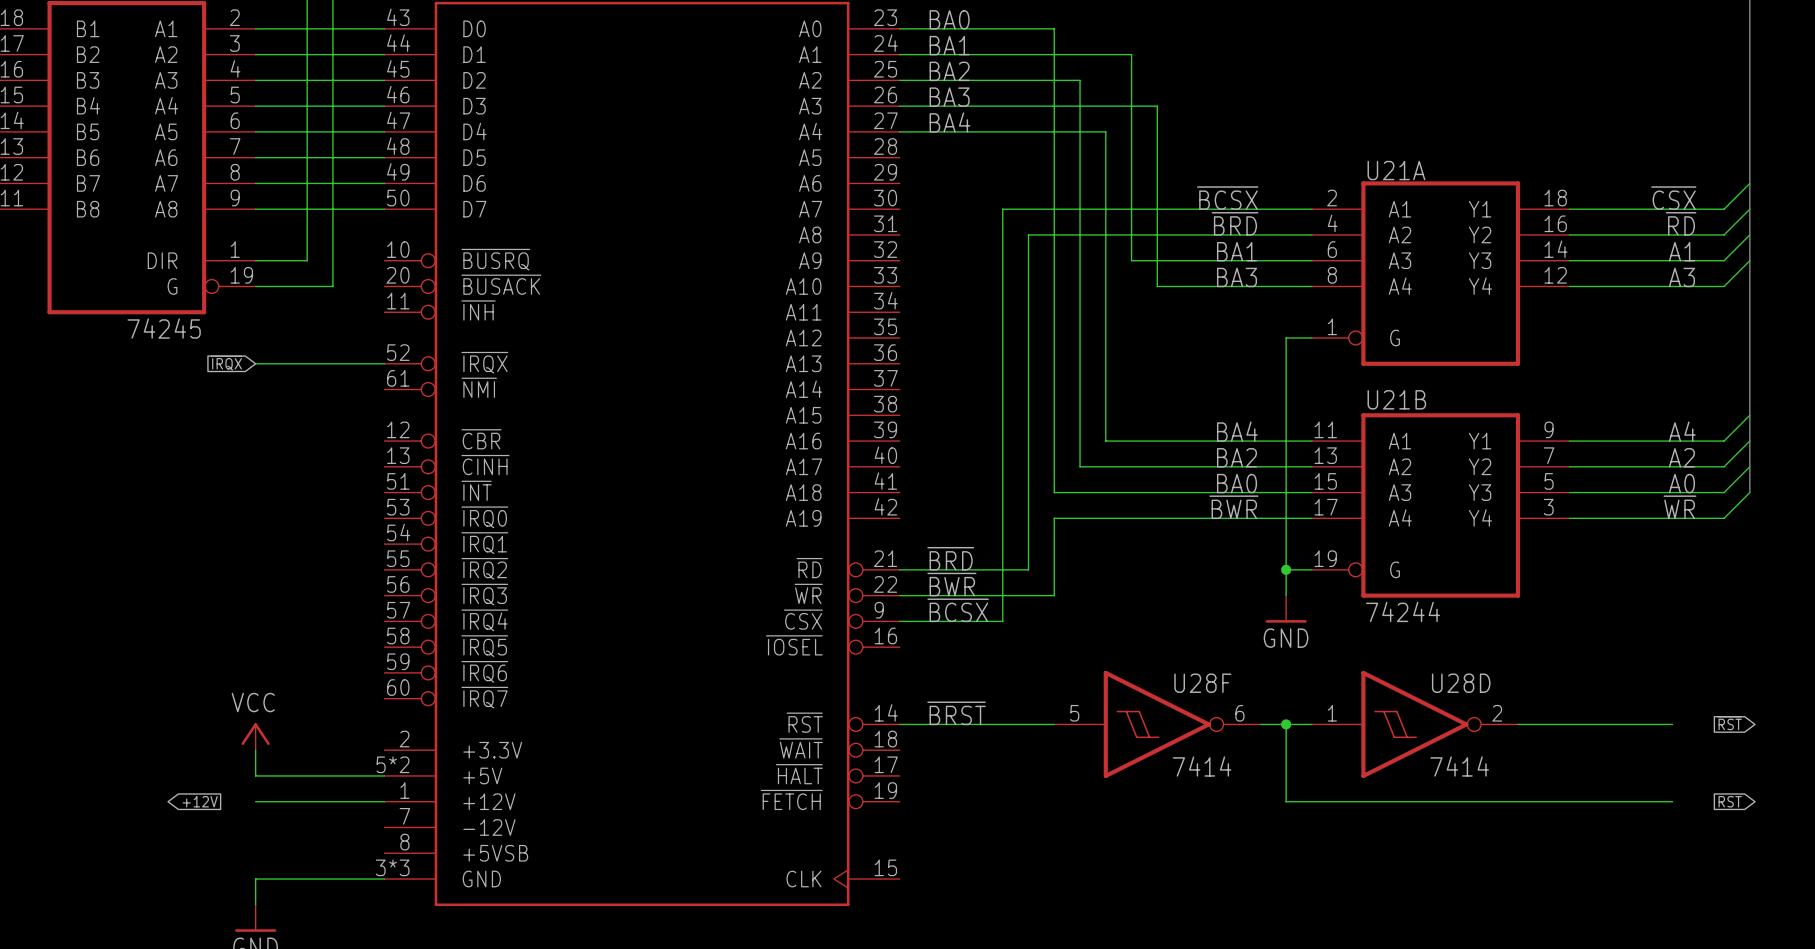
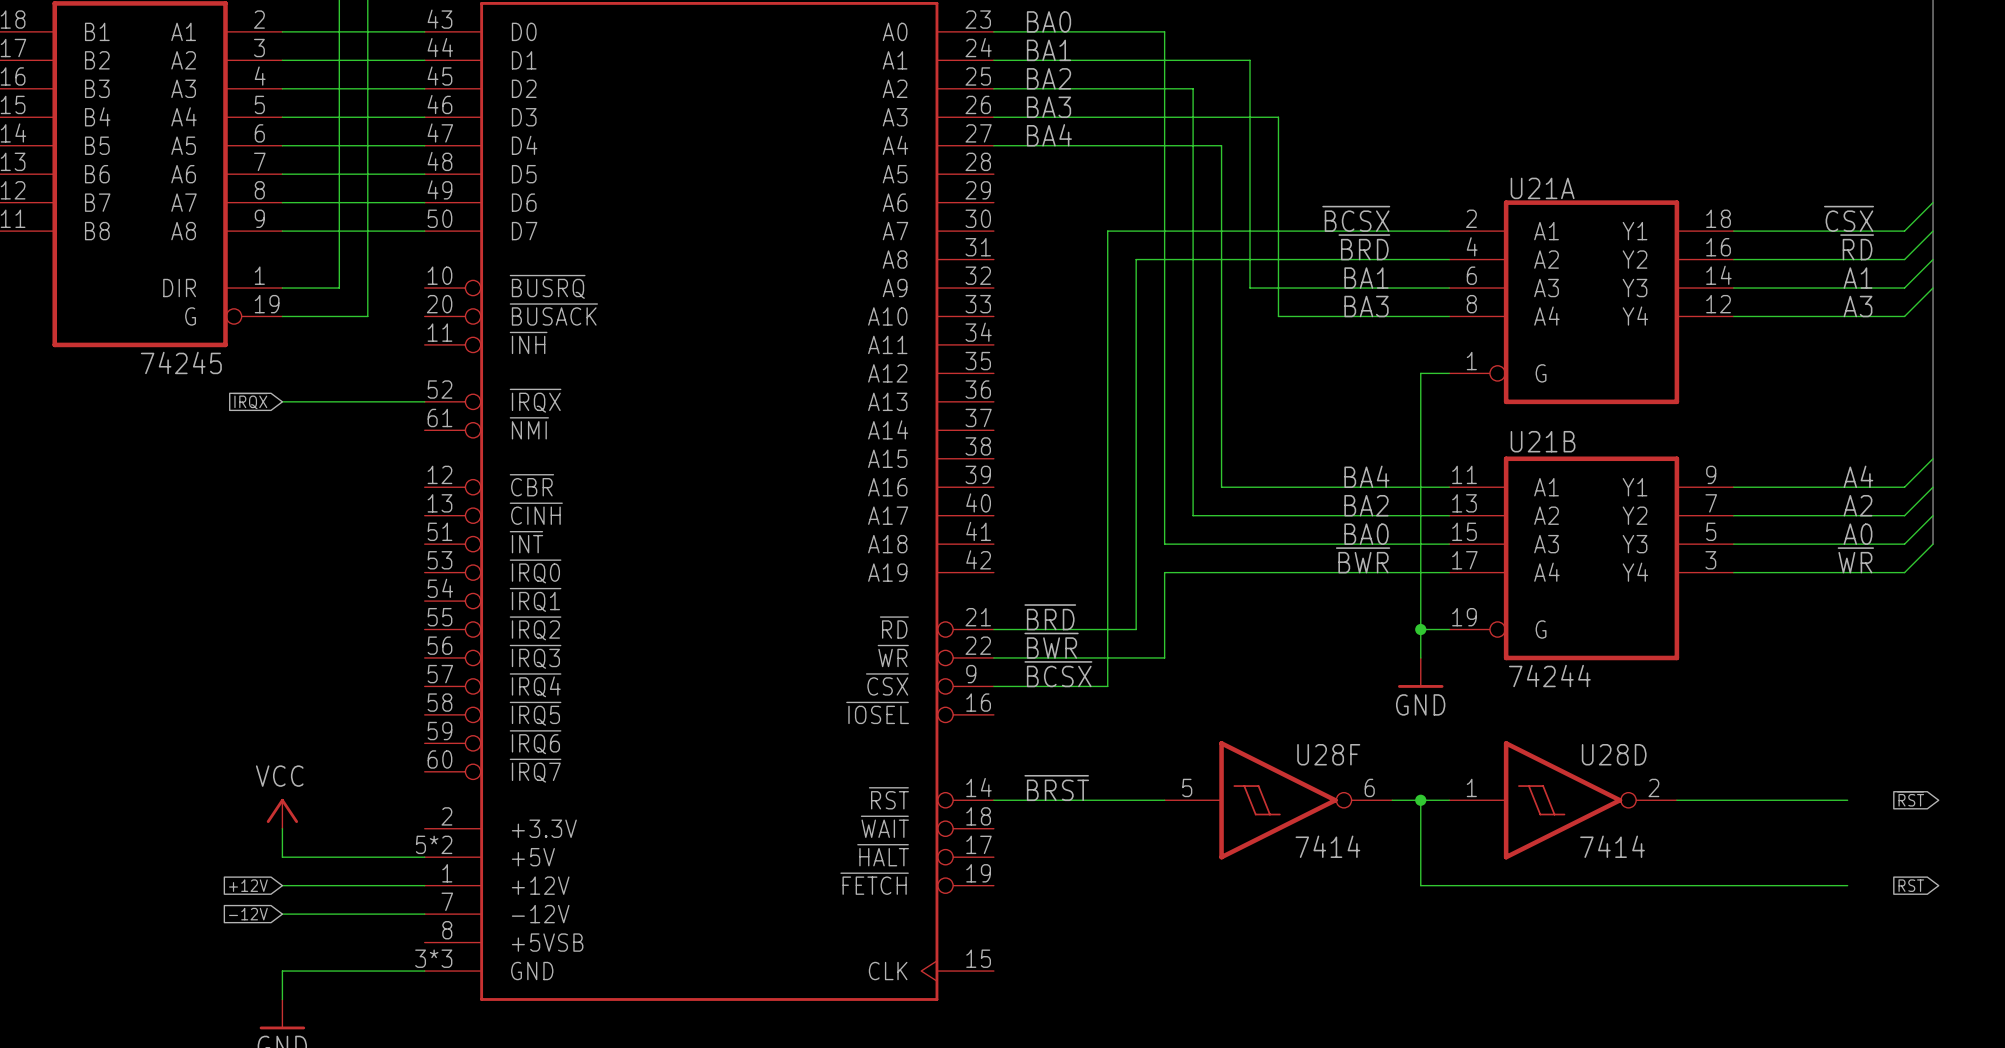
global label rotation: 0° (200, 801) -> 180° (248, 885)
global label: none -> -12V (248, 914)
wire: none -> (282, 914) (424, 914)

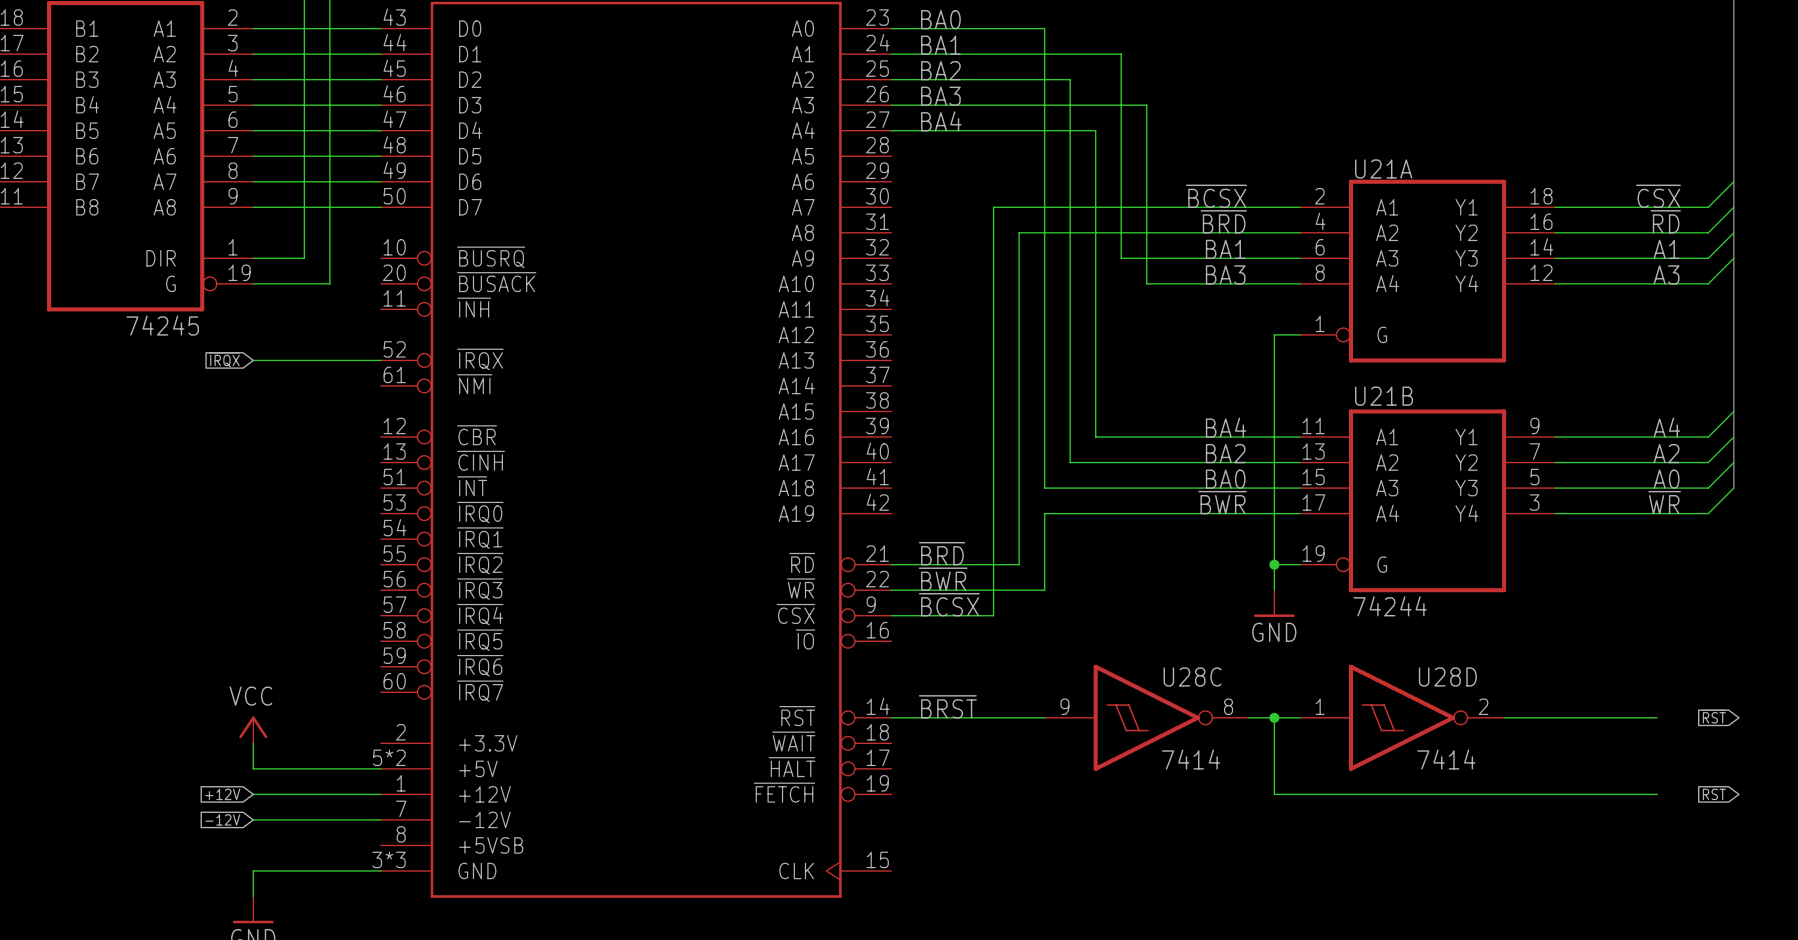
part pin name: ~{IOSEL} (877, 712) -> ~{IO} (805, 639)
U28F name: U28F (1328, 754) -> U28C (1192, 676)
U28F pin number: 5 (1187, 787) -> 9 (1064, 706)
U28F pin number: 6 (1369, 787) -> 8 (1228, 706)

